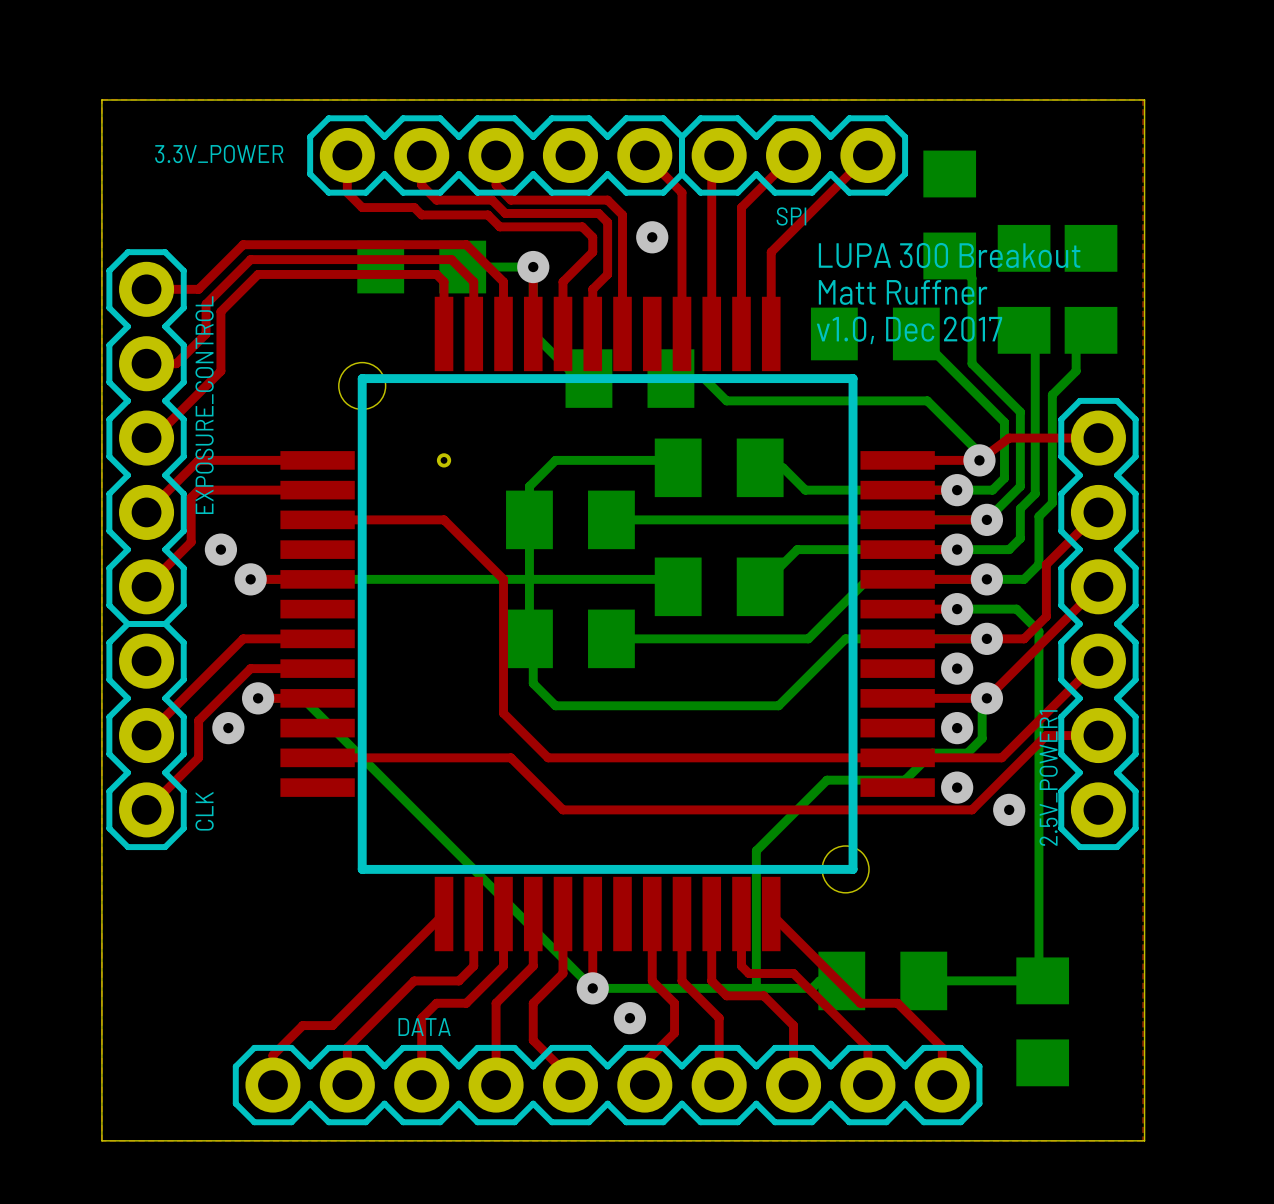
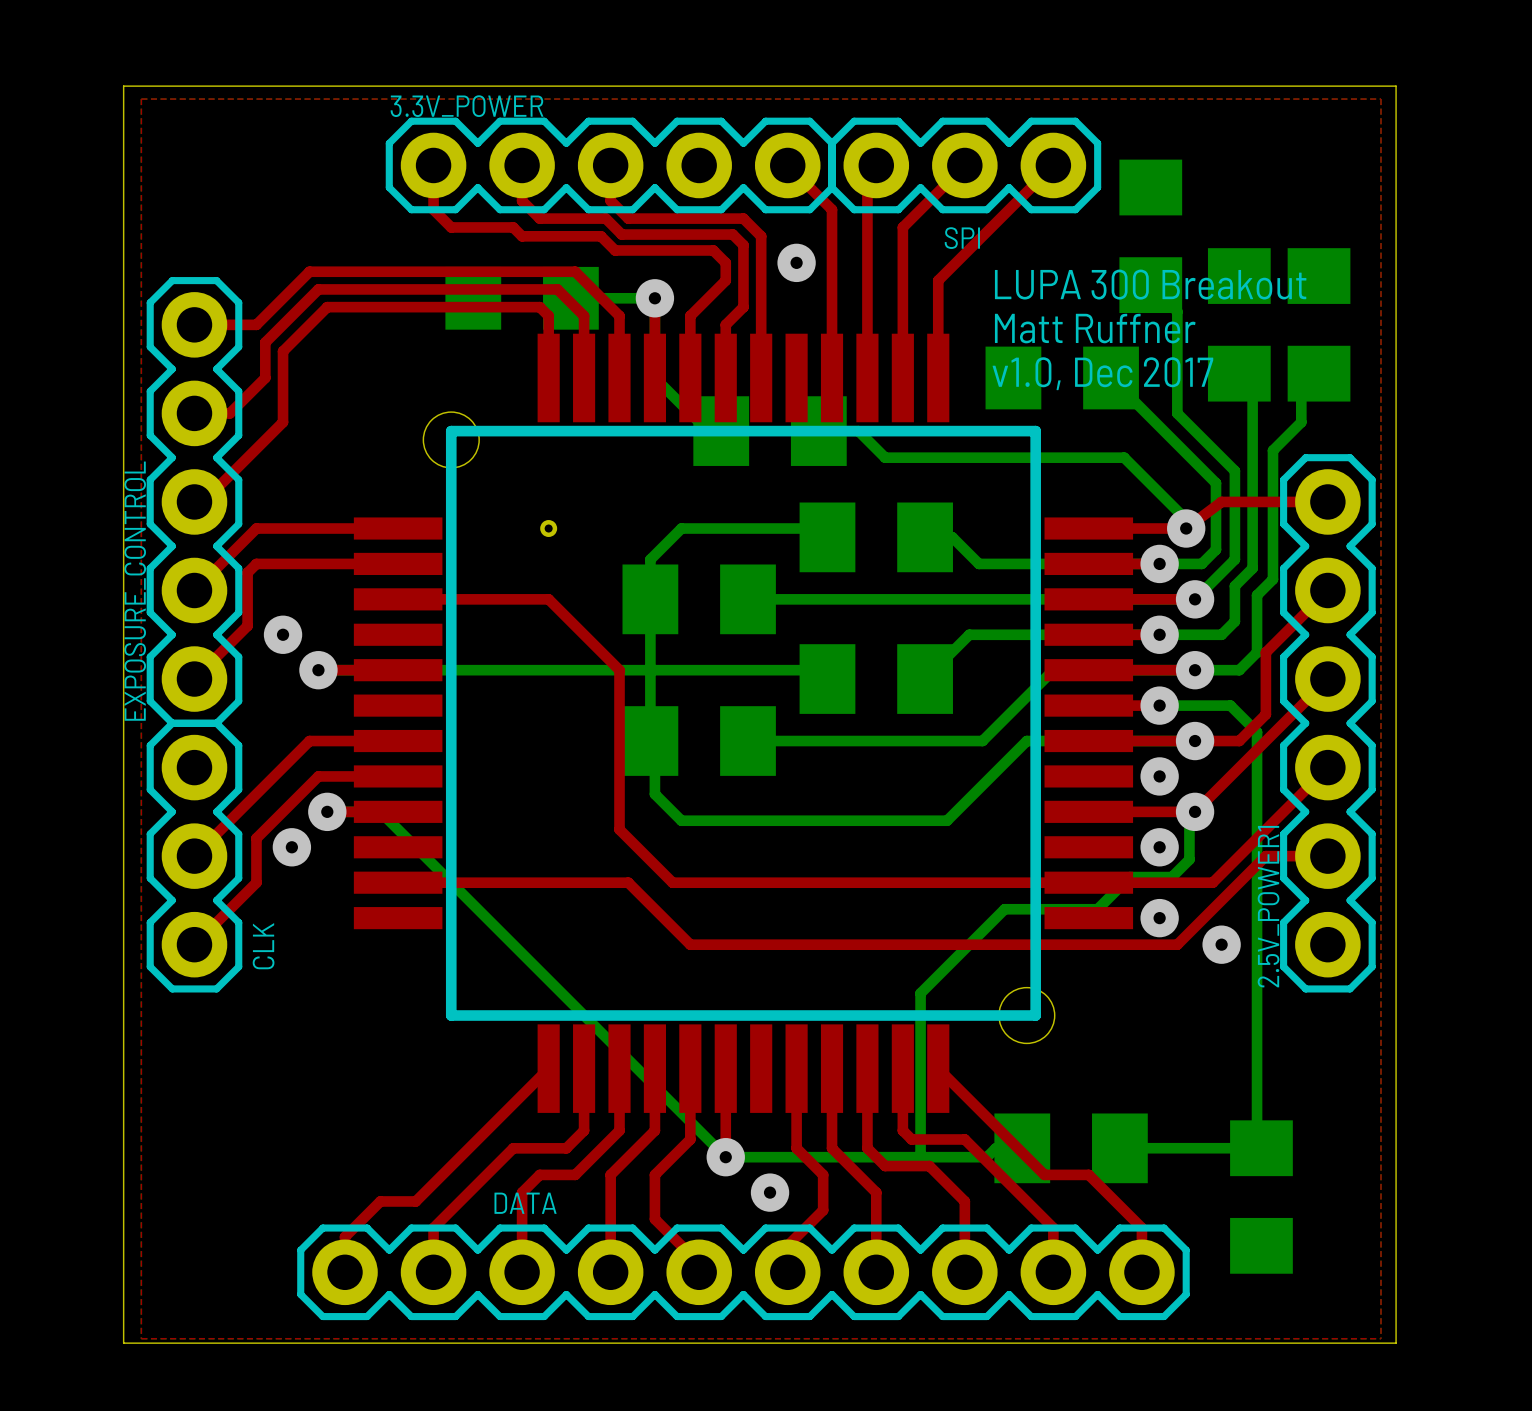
board edge: (101, 100) (1144, 100) (1144, 1140) (101, 1140) (101, 100) -> (123, 86) (123, 1343) (1396, 1343) (1396, 86) (123, 86)
3.3V_POWER name position: 3.3V_POWER (219, 154) -> 3.3V_POWER (467, 106)
EXPOSURE_CONTROL name position: EXPOSURE_CONTROL (204, 405) -> EXPOSURE_CONTROL (135, 591)

